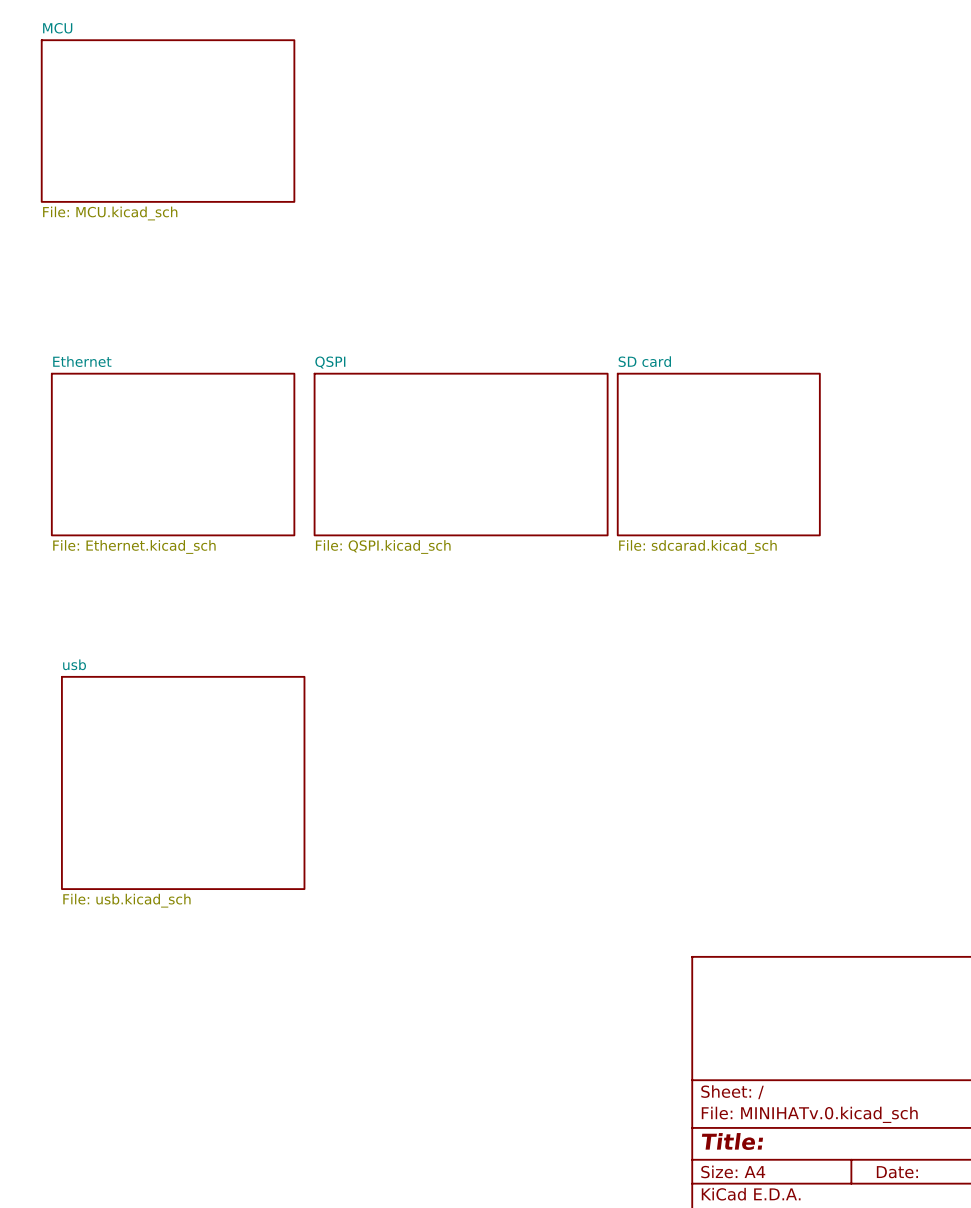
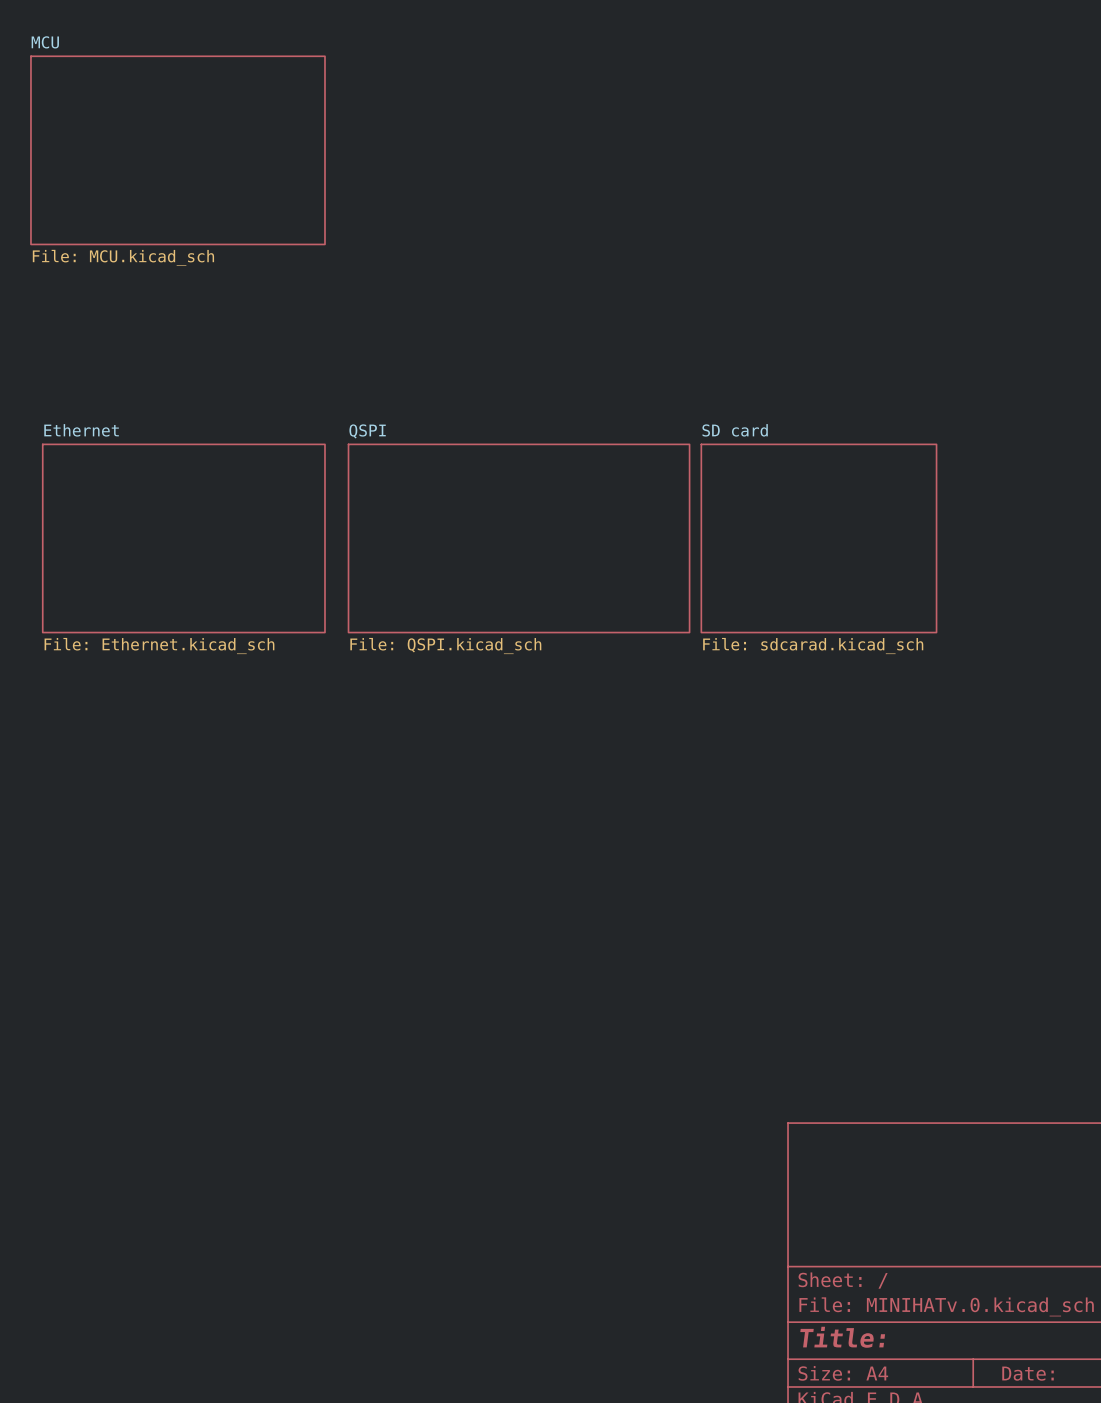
sheet usb: File: usb.kicad_sch (183, 782) -> none

